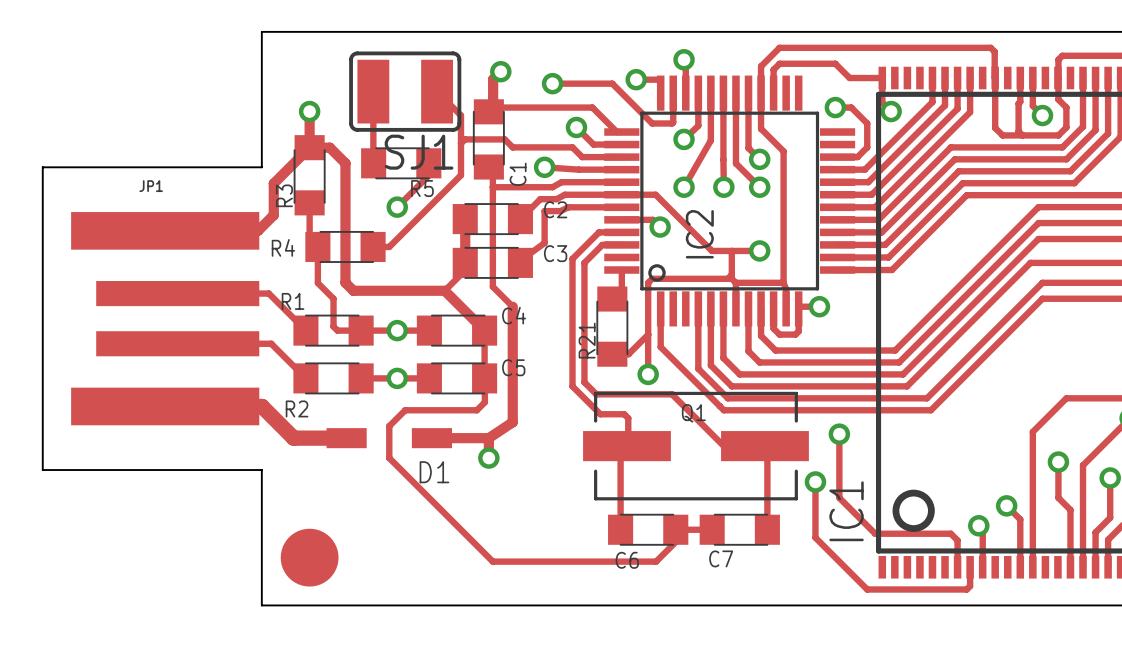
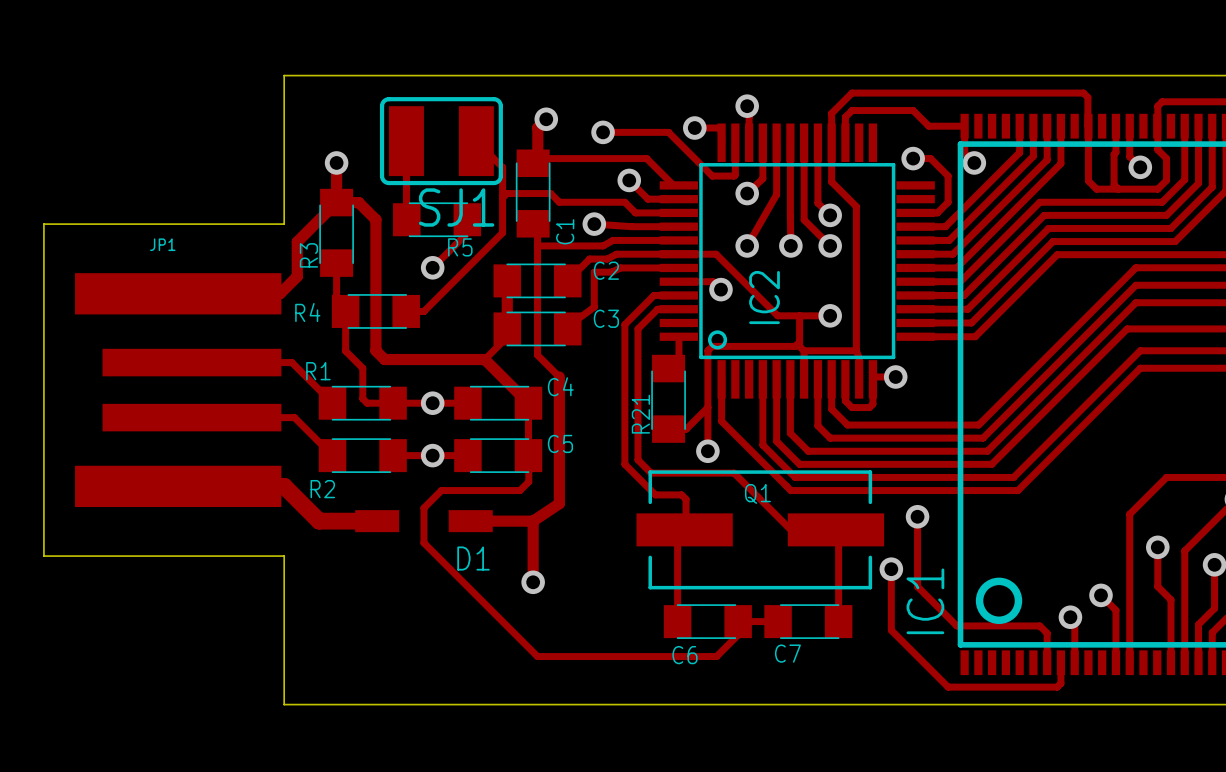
track: none -> (533, 542) (533, 582)
via position: (488, 458) -> (533, 582)
drawing: [280, 528, 339, 587] -> none

